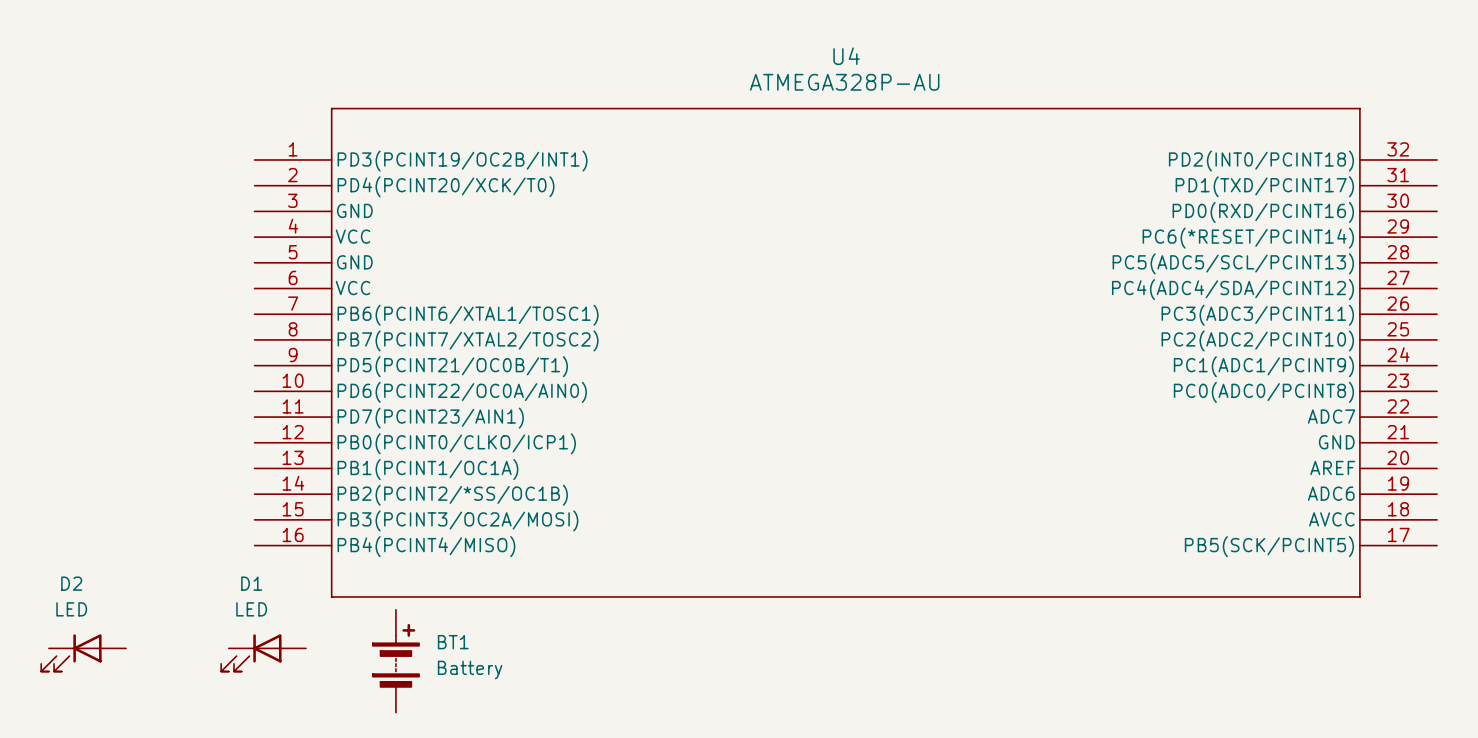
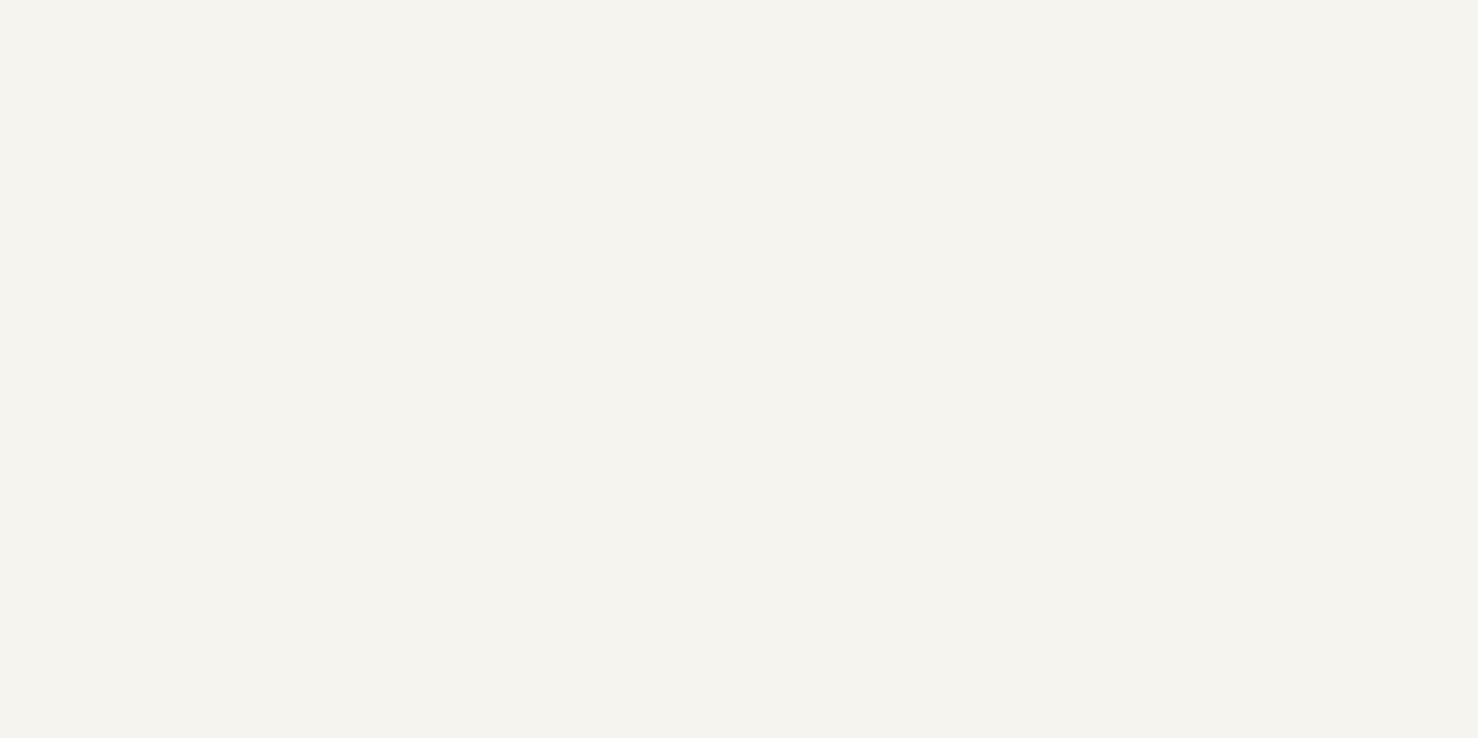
U4: ATMEGA328P-AU (845, 352) -> none
D2: LED (83, 652) -> none
D1: LED (263, 652) -> none
BT1: Battery (395, 661) -> none

